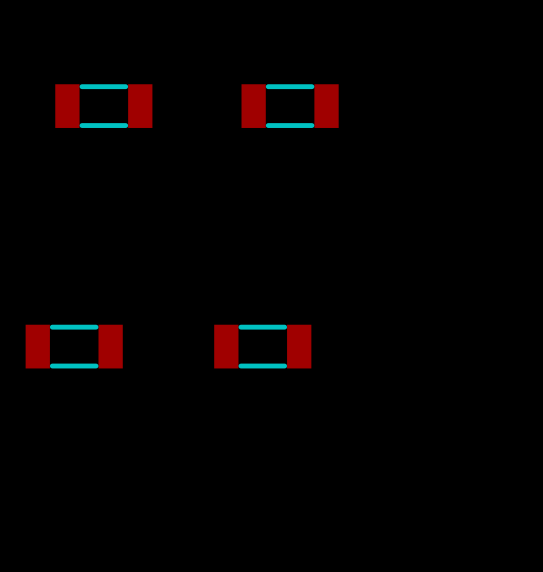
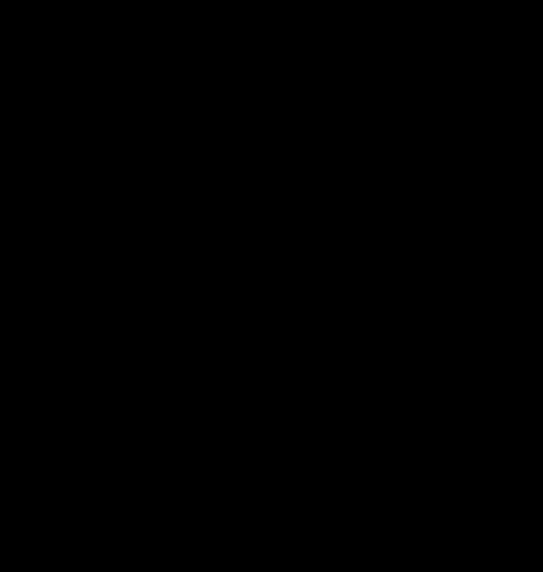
part: (103, 106) -> none
part: (290, 106) -> none
part: (74, 346) -> none
part: (262, 346) -> none

